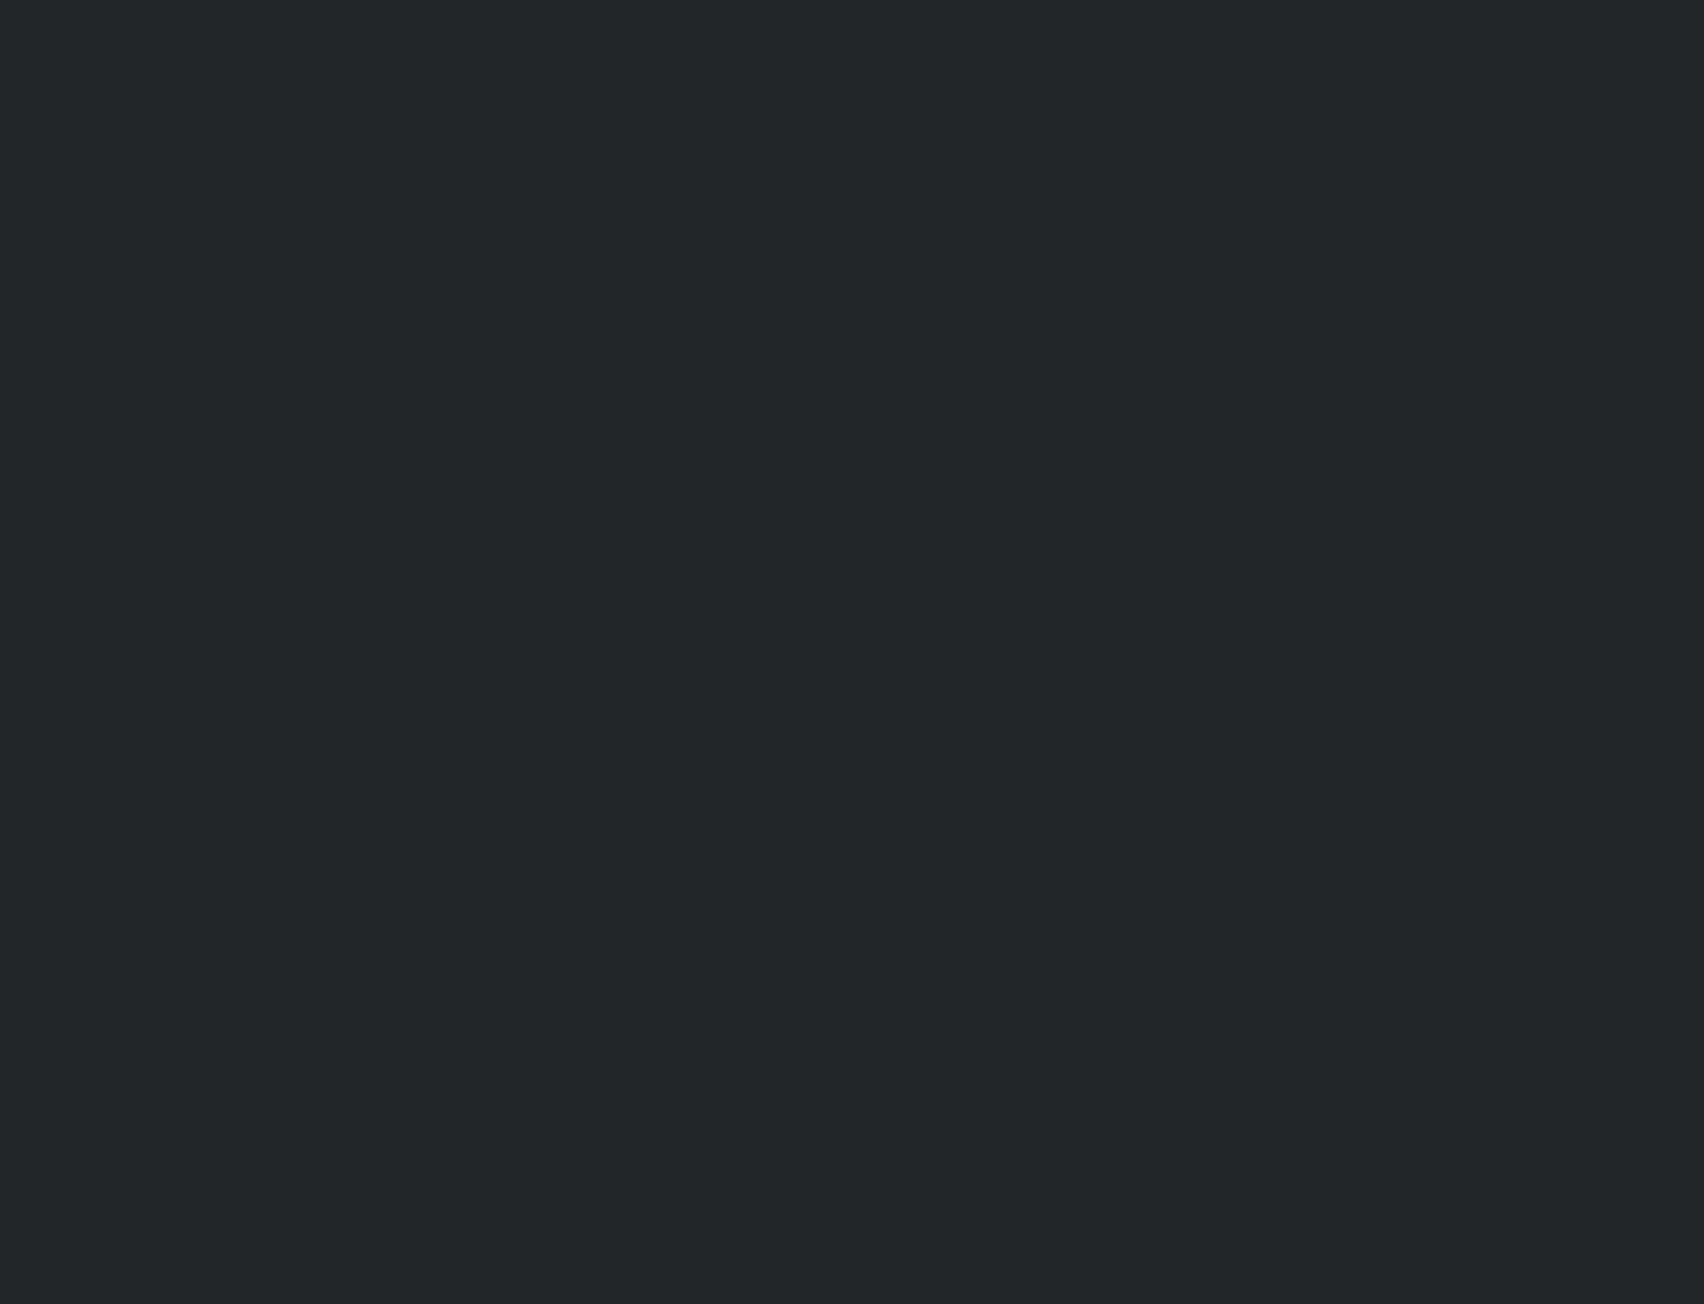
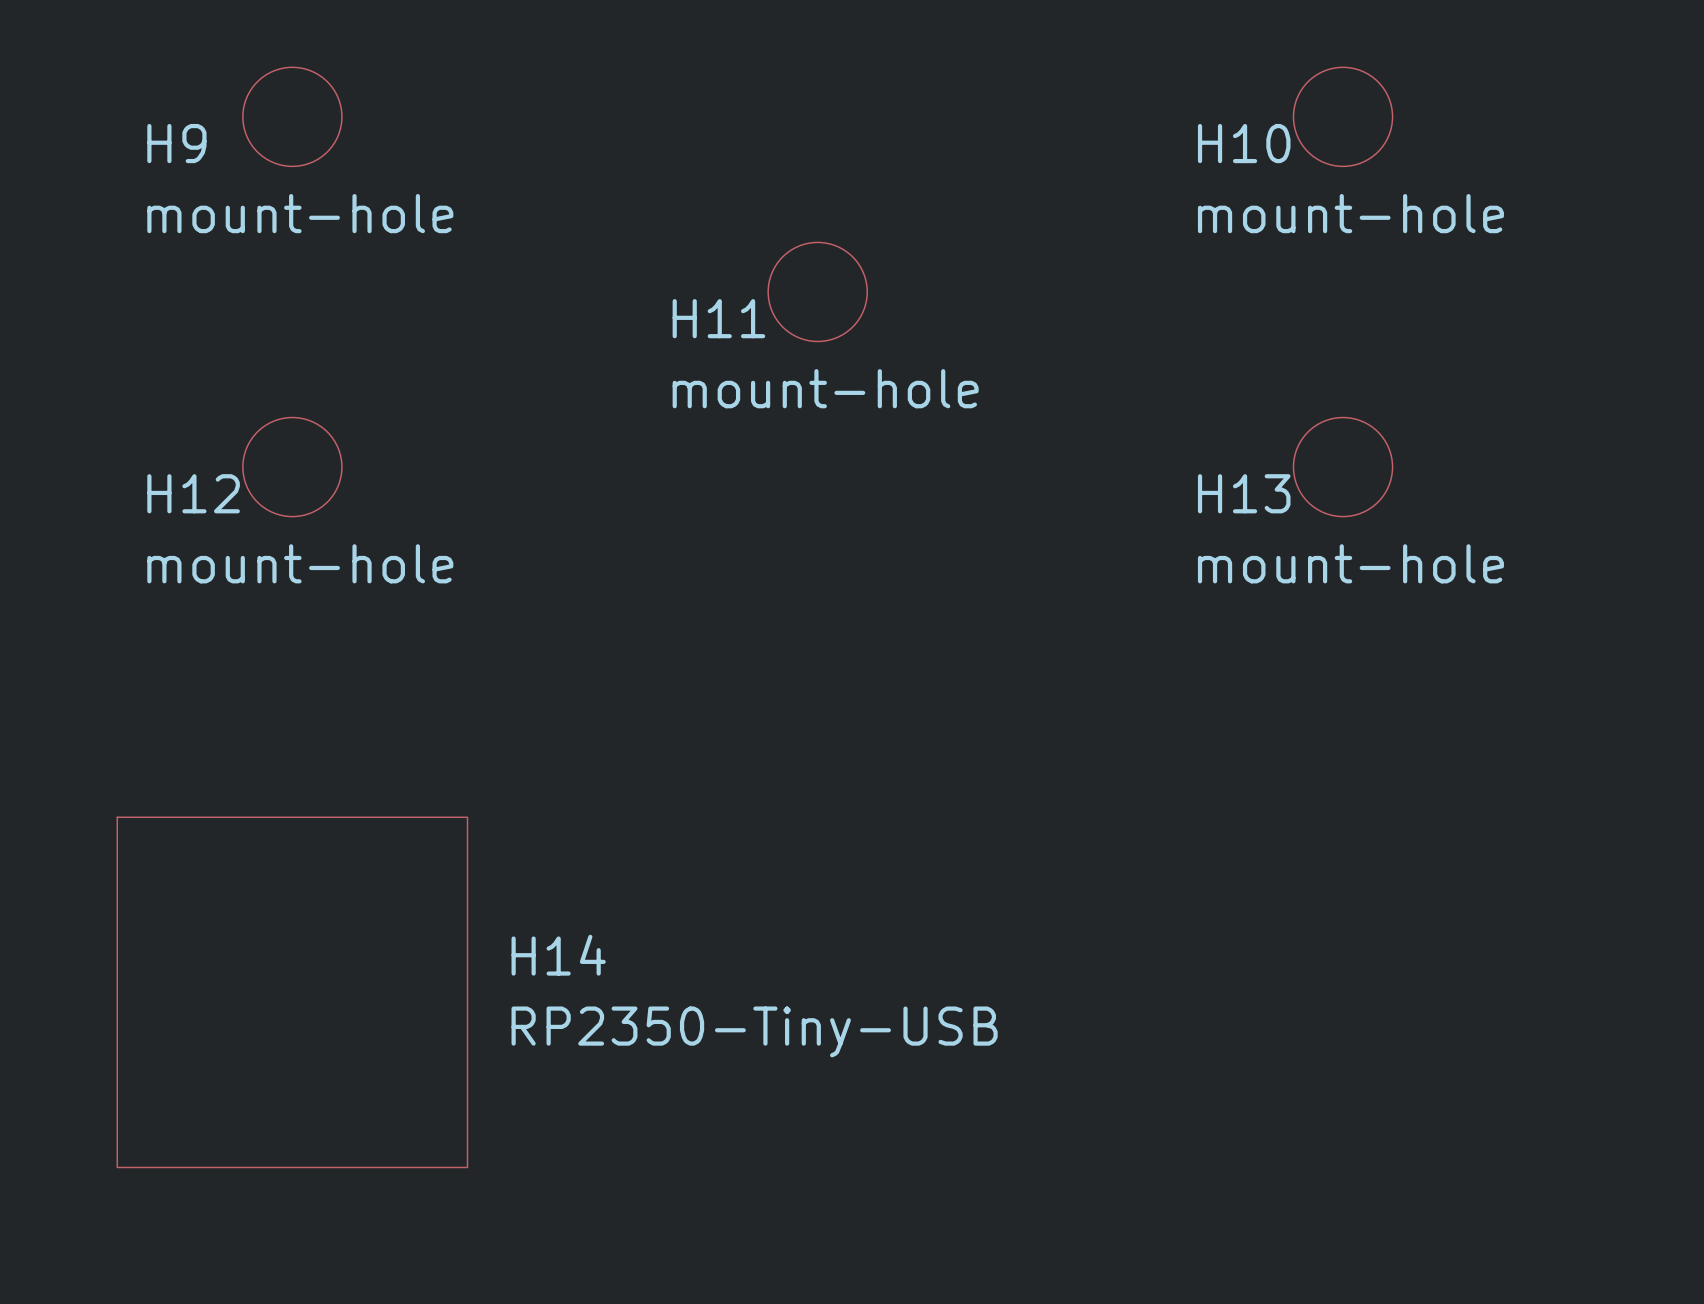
H9: none -> mount-hole (292, 116)
H10: none -> mount-hole (1343, 116)
H11: none -> mount-hole (817, 291)
H12: none -> mount-hole (292, 467)
H13: none -> mount-hole (1343, 467)
H14: none -> RP2350-Tiny-USB (292, 992)

